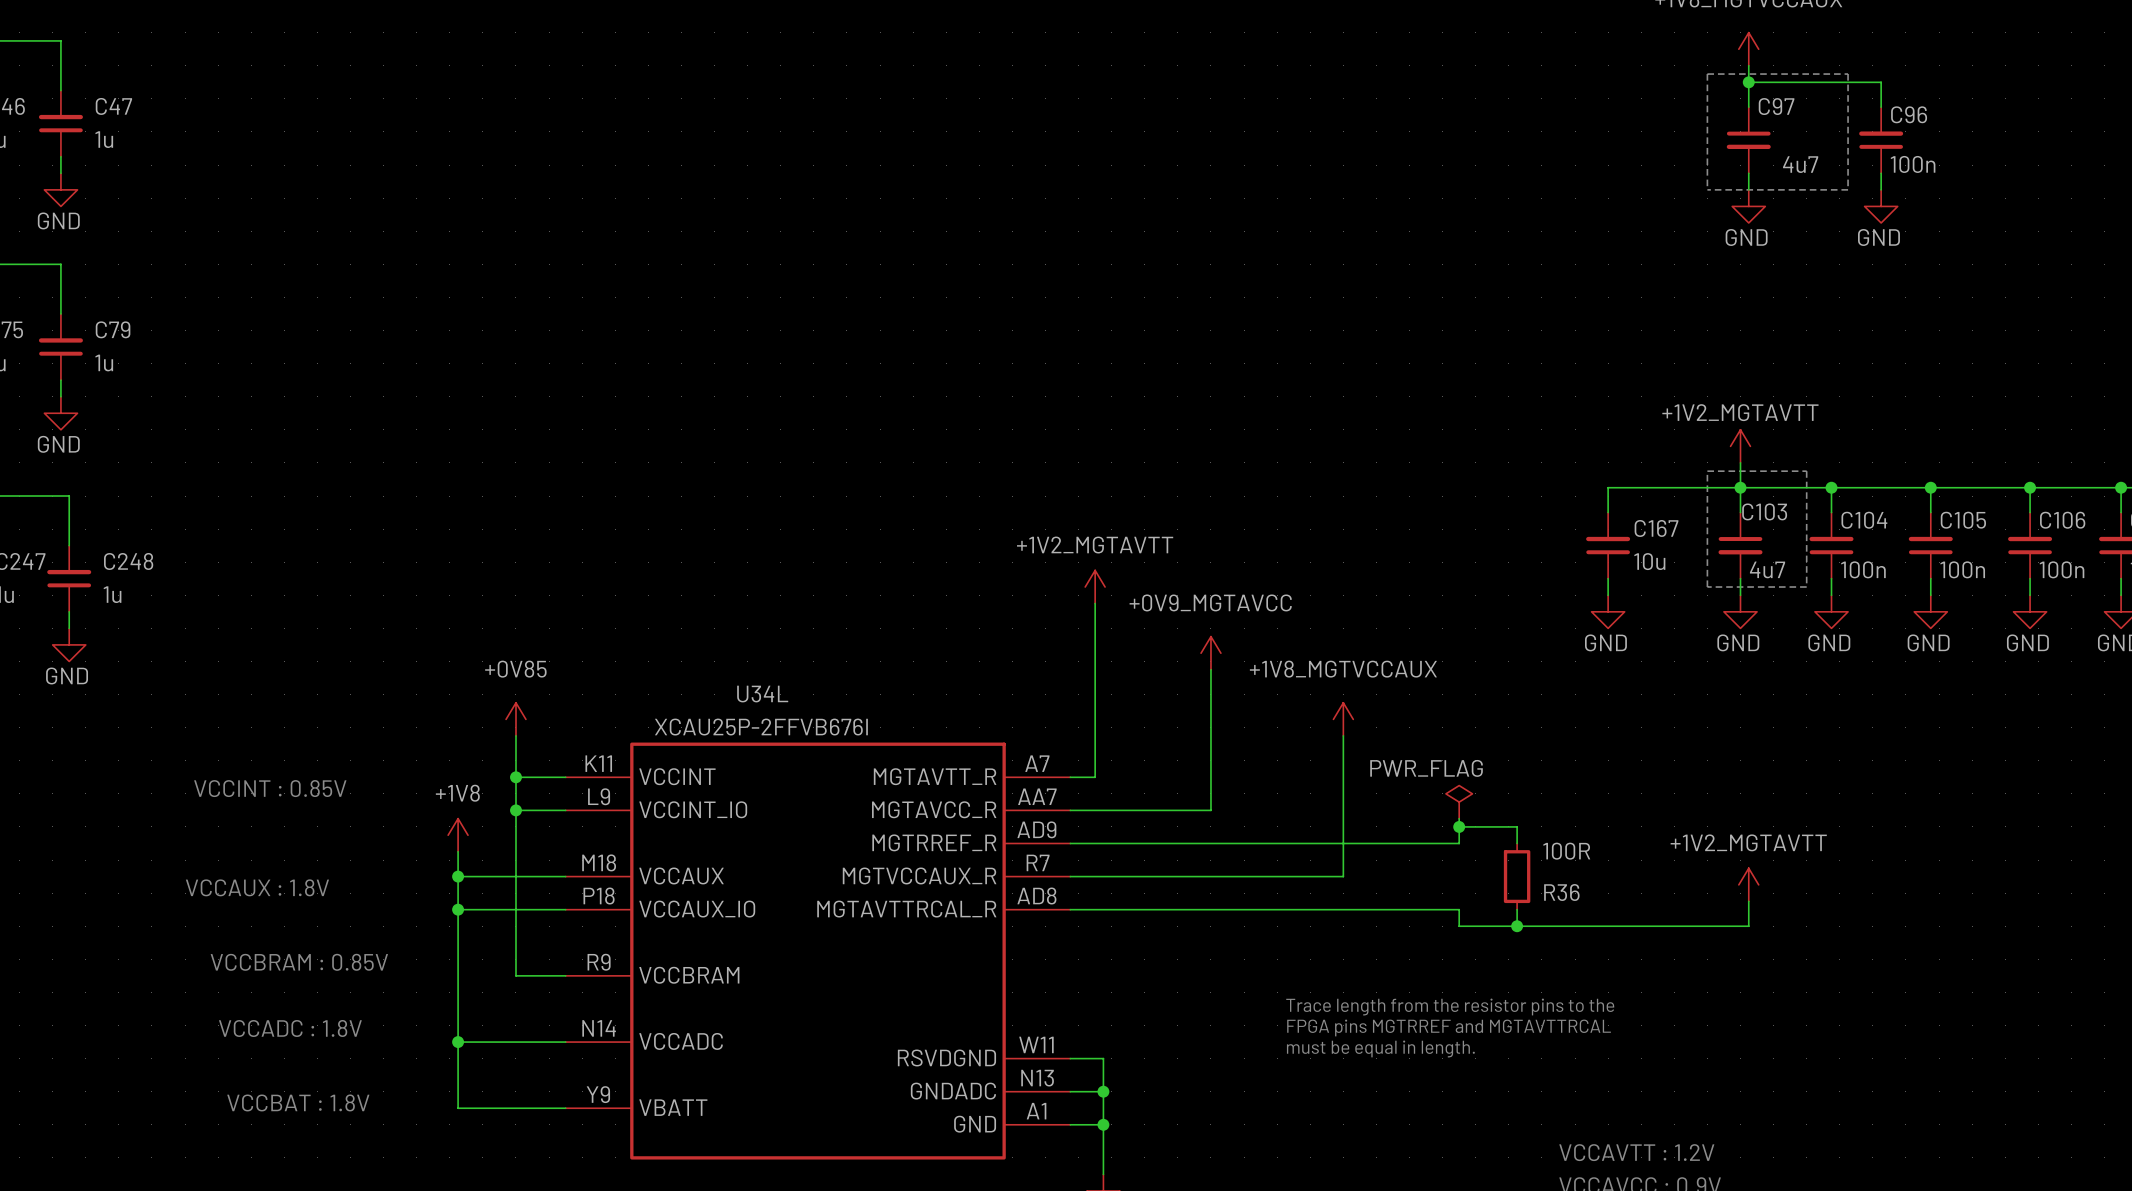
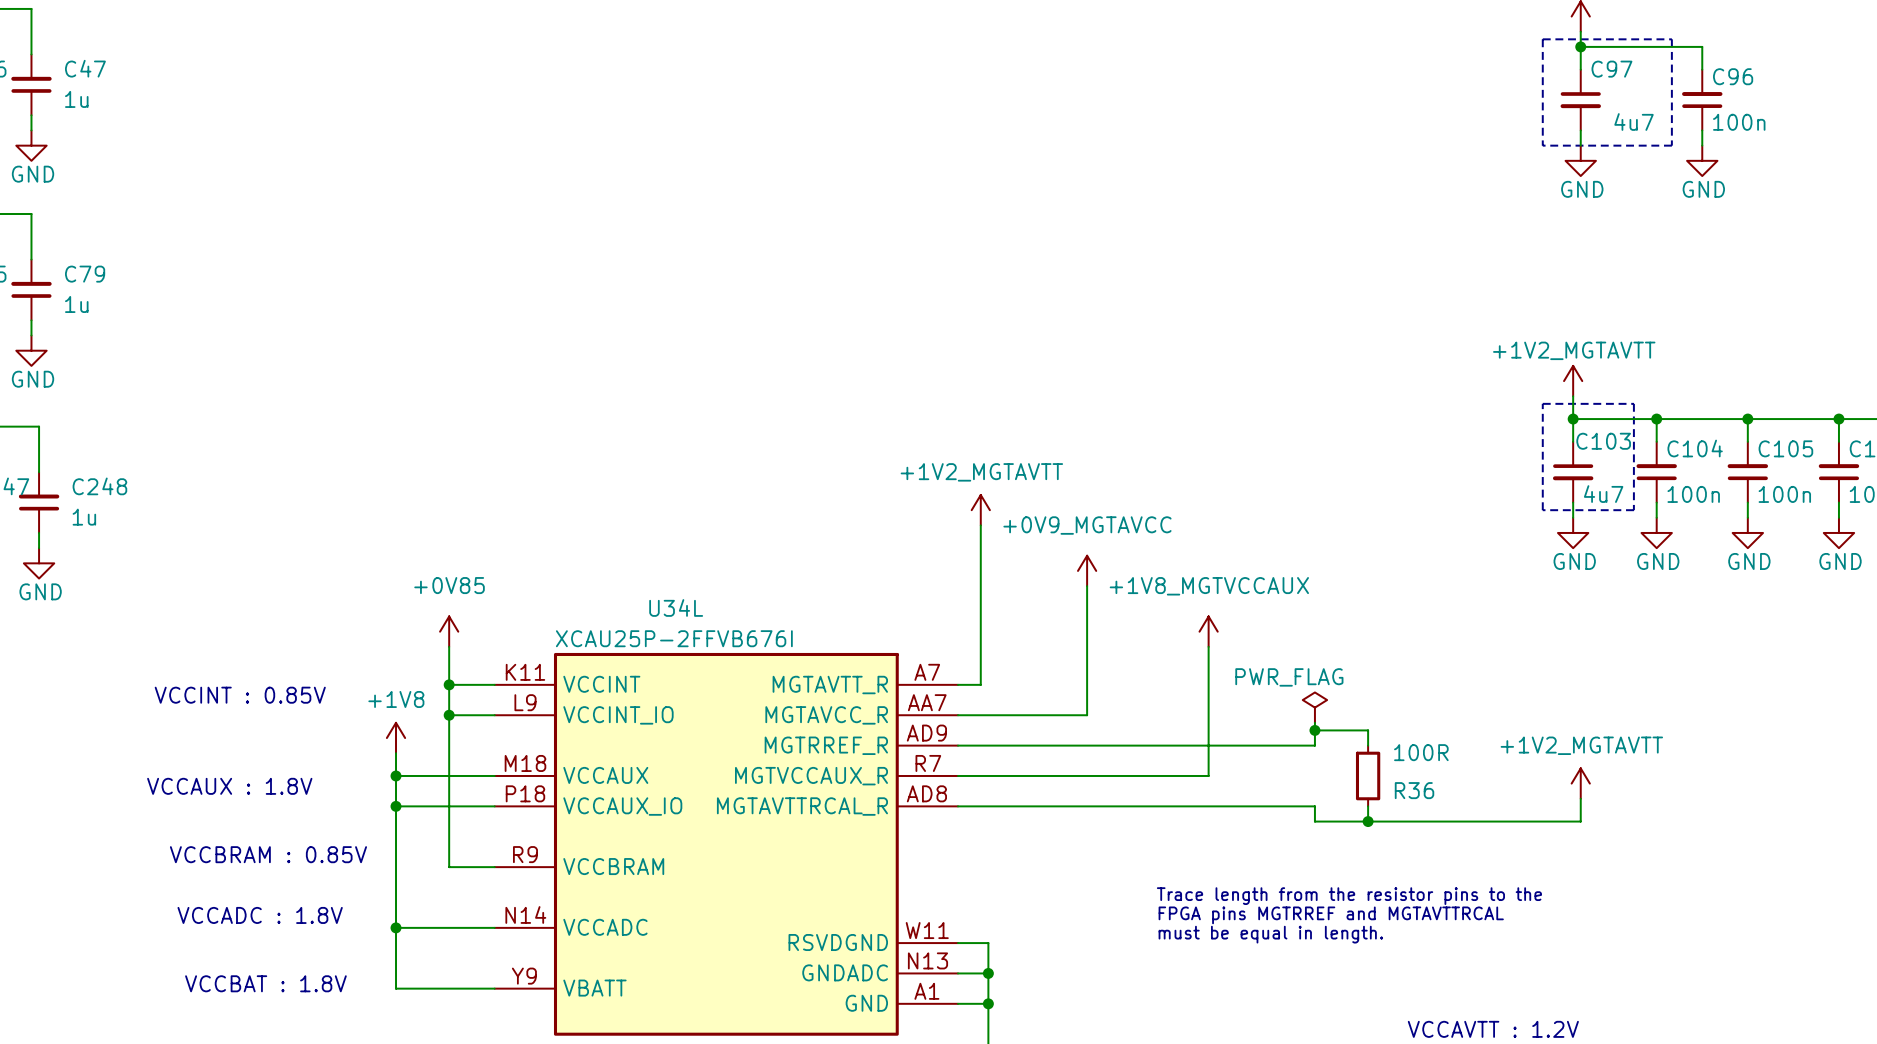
wire: (1740, 487) (1608, 487) (1608, 512) -> none
C167: (1608, 545) -> none
wire: (1608, 578) (1608, 595) -> none
power symbol: GND (1608, 611) -> none

